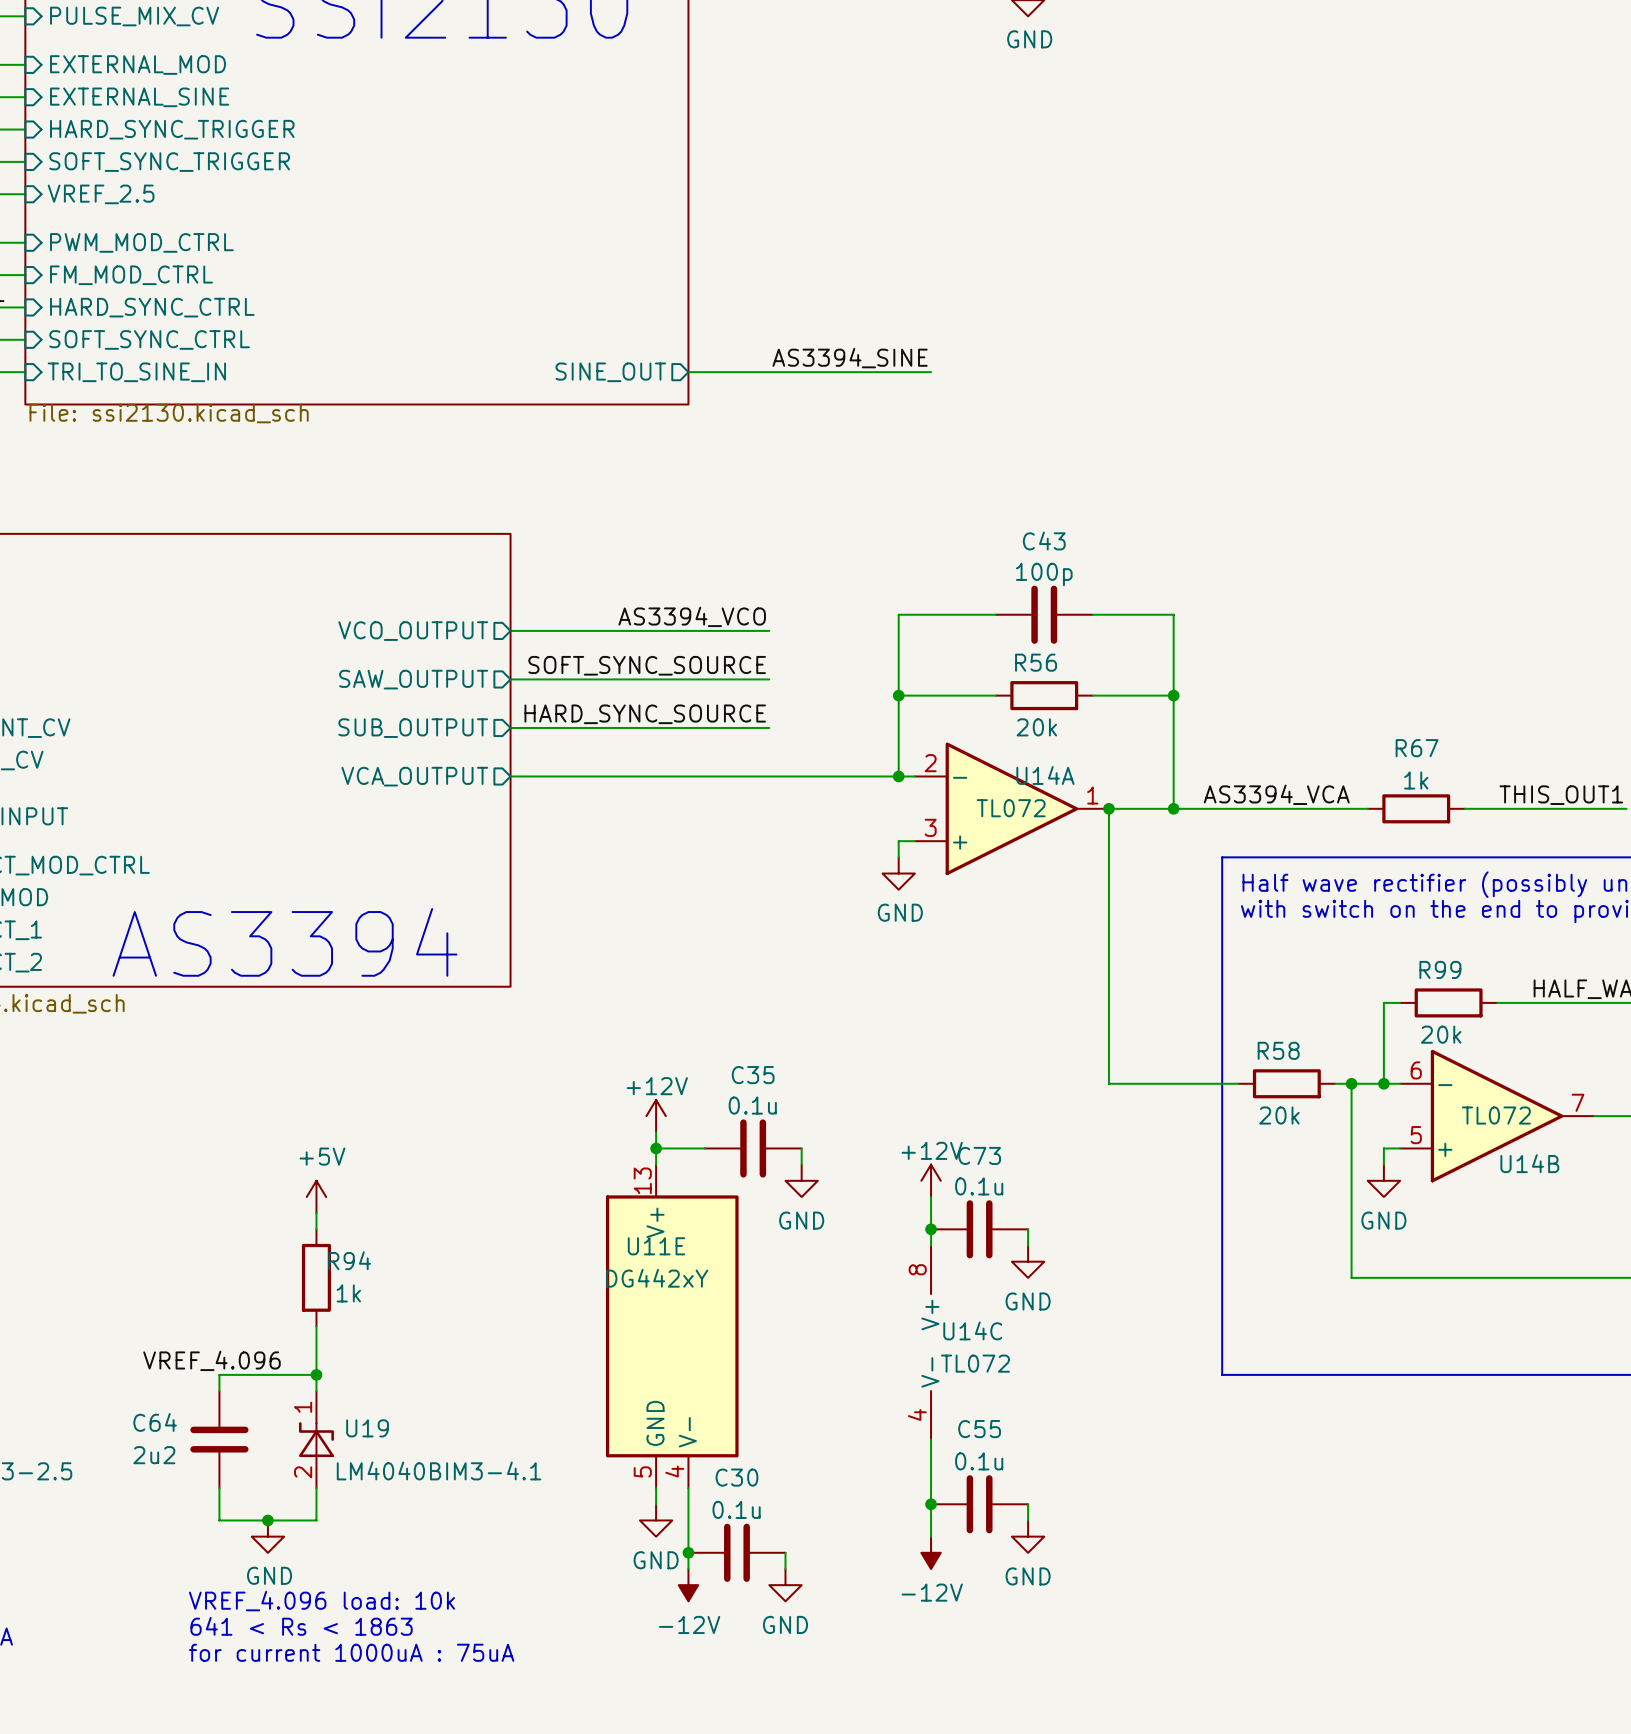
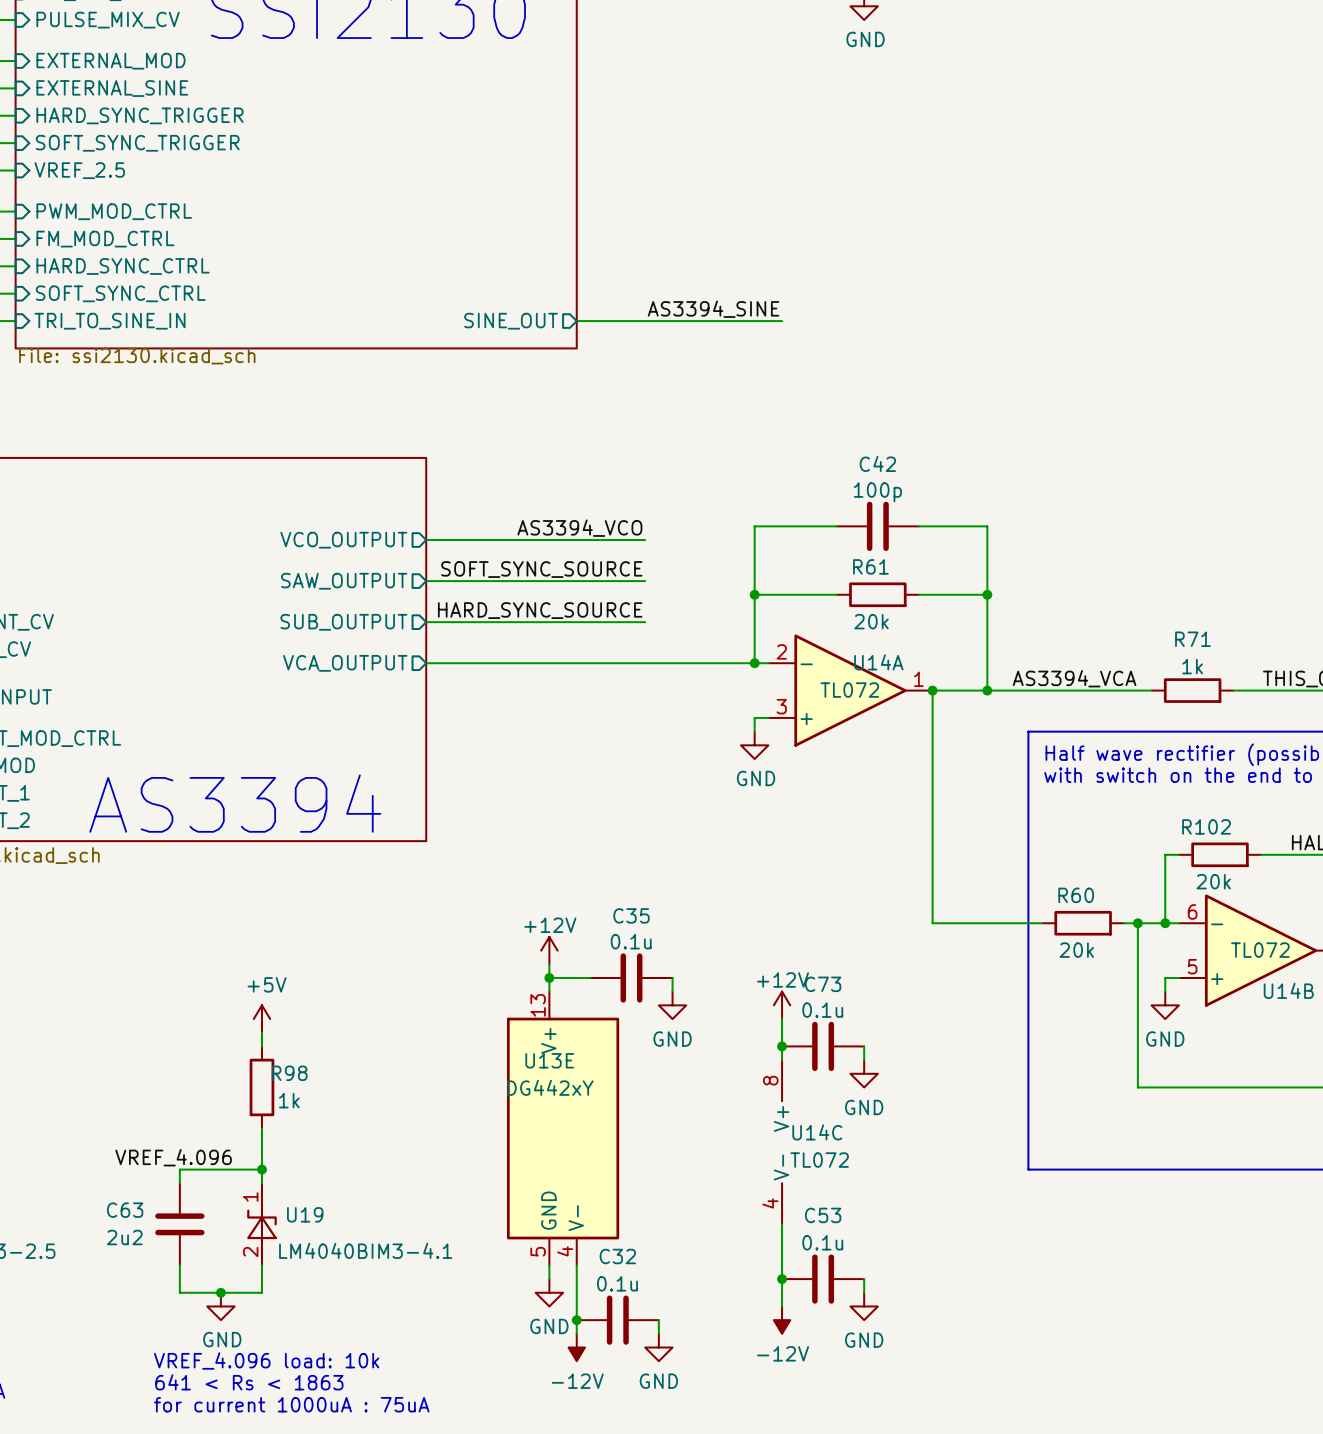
C43 name: C43 (1044, 540) -> C42 (877, 463)
R56 name: R56 (1036, 662) -> R61 (870, 566)
R67 name: R67 (1417, 748) -> R71 (1192, 639)
R99 name: R99 (1440, 969) -> R102 (1206, 826)
R58 name: R58 (1278, 1050) -> R60 (1076, 895)
U11E name: U11E (656, 1246) -> U13E (549, 1060)
R94 name: R94 (349, 1260) -> R98 (289, 1073)
C64 name: C64 (155, 1422) -> C63 (125, 1210)
C55 name: C55 (979, 1429) -> C53 (823, 1215)
C30 name: C30 (736, 1477) -> C32 (617, 1256)

